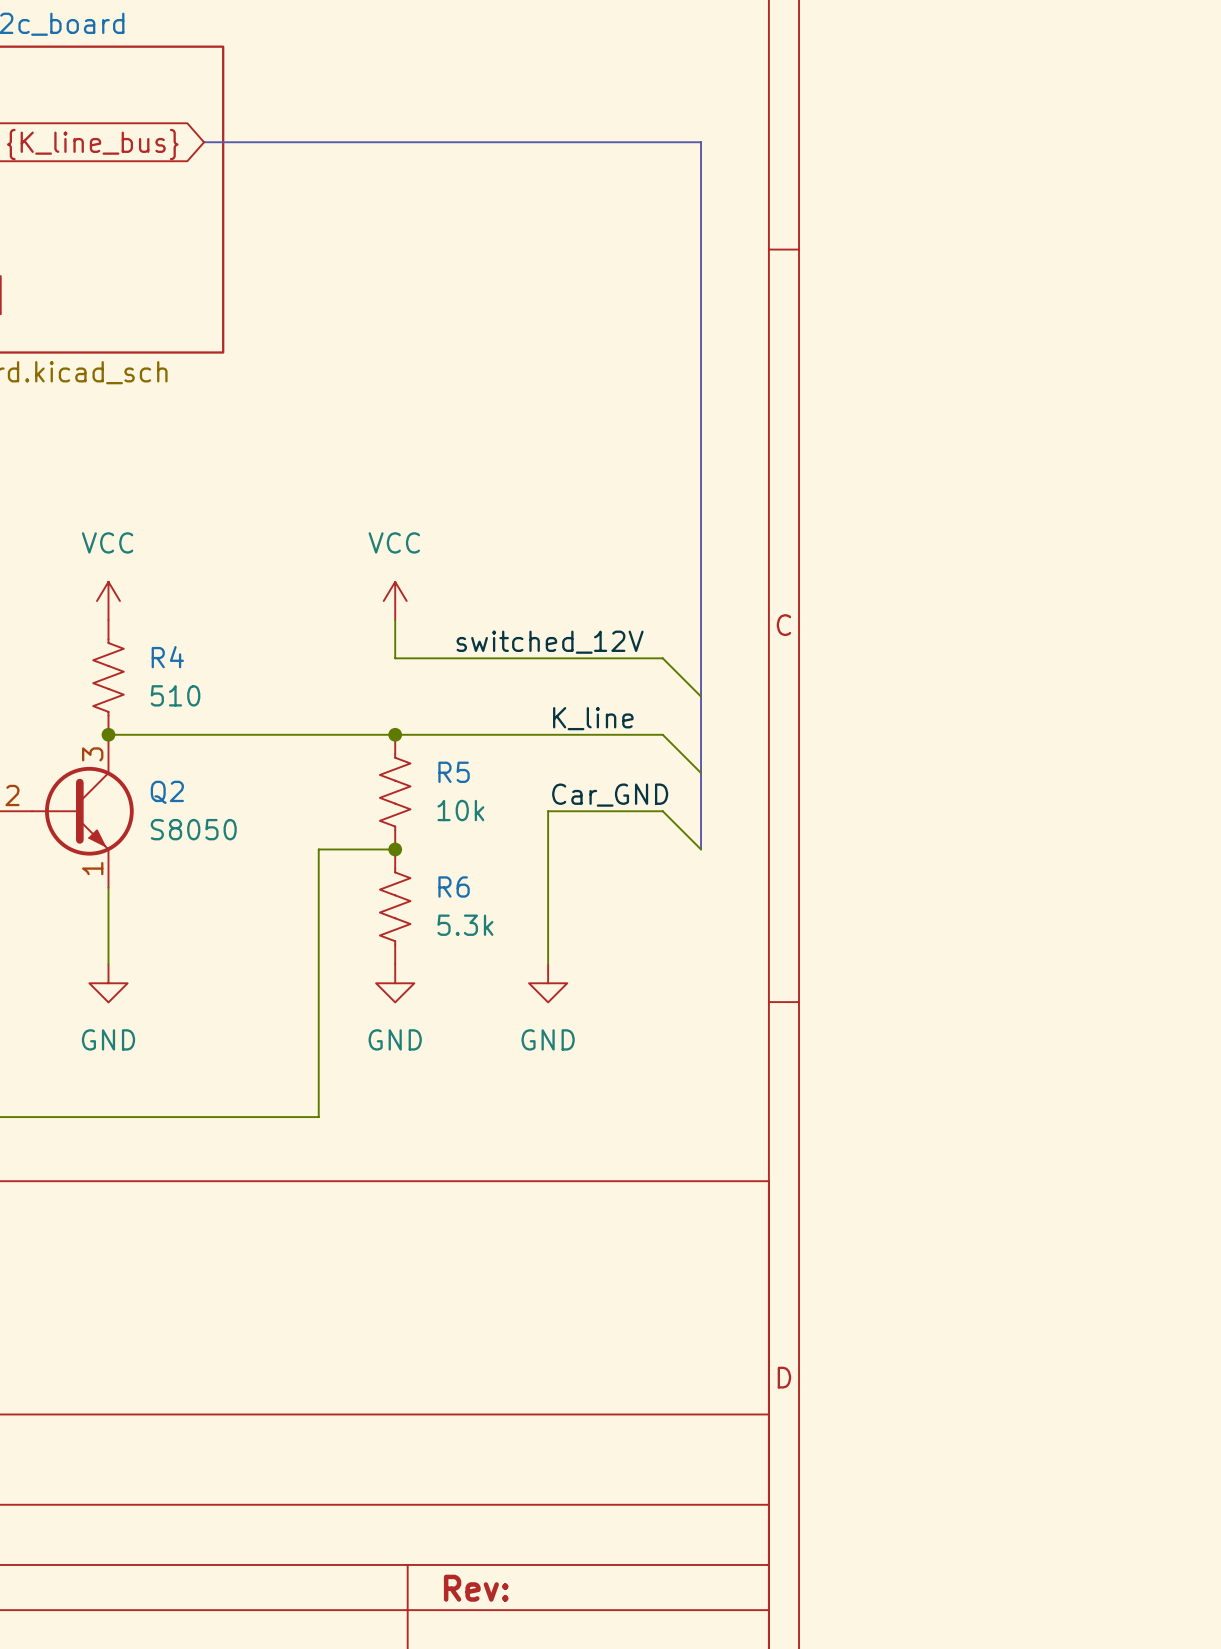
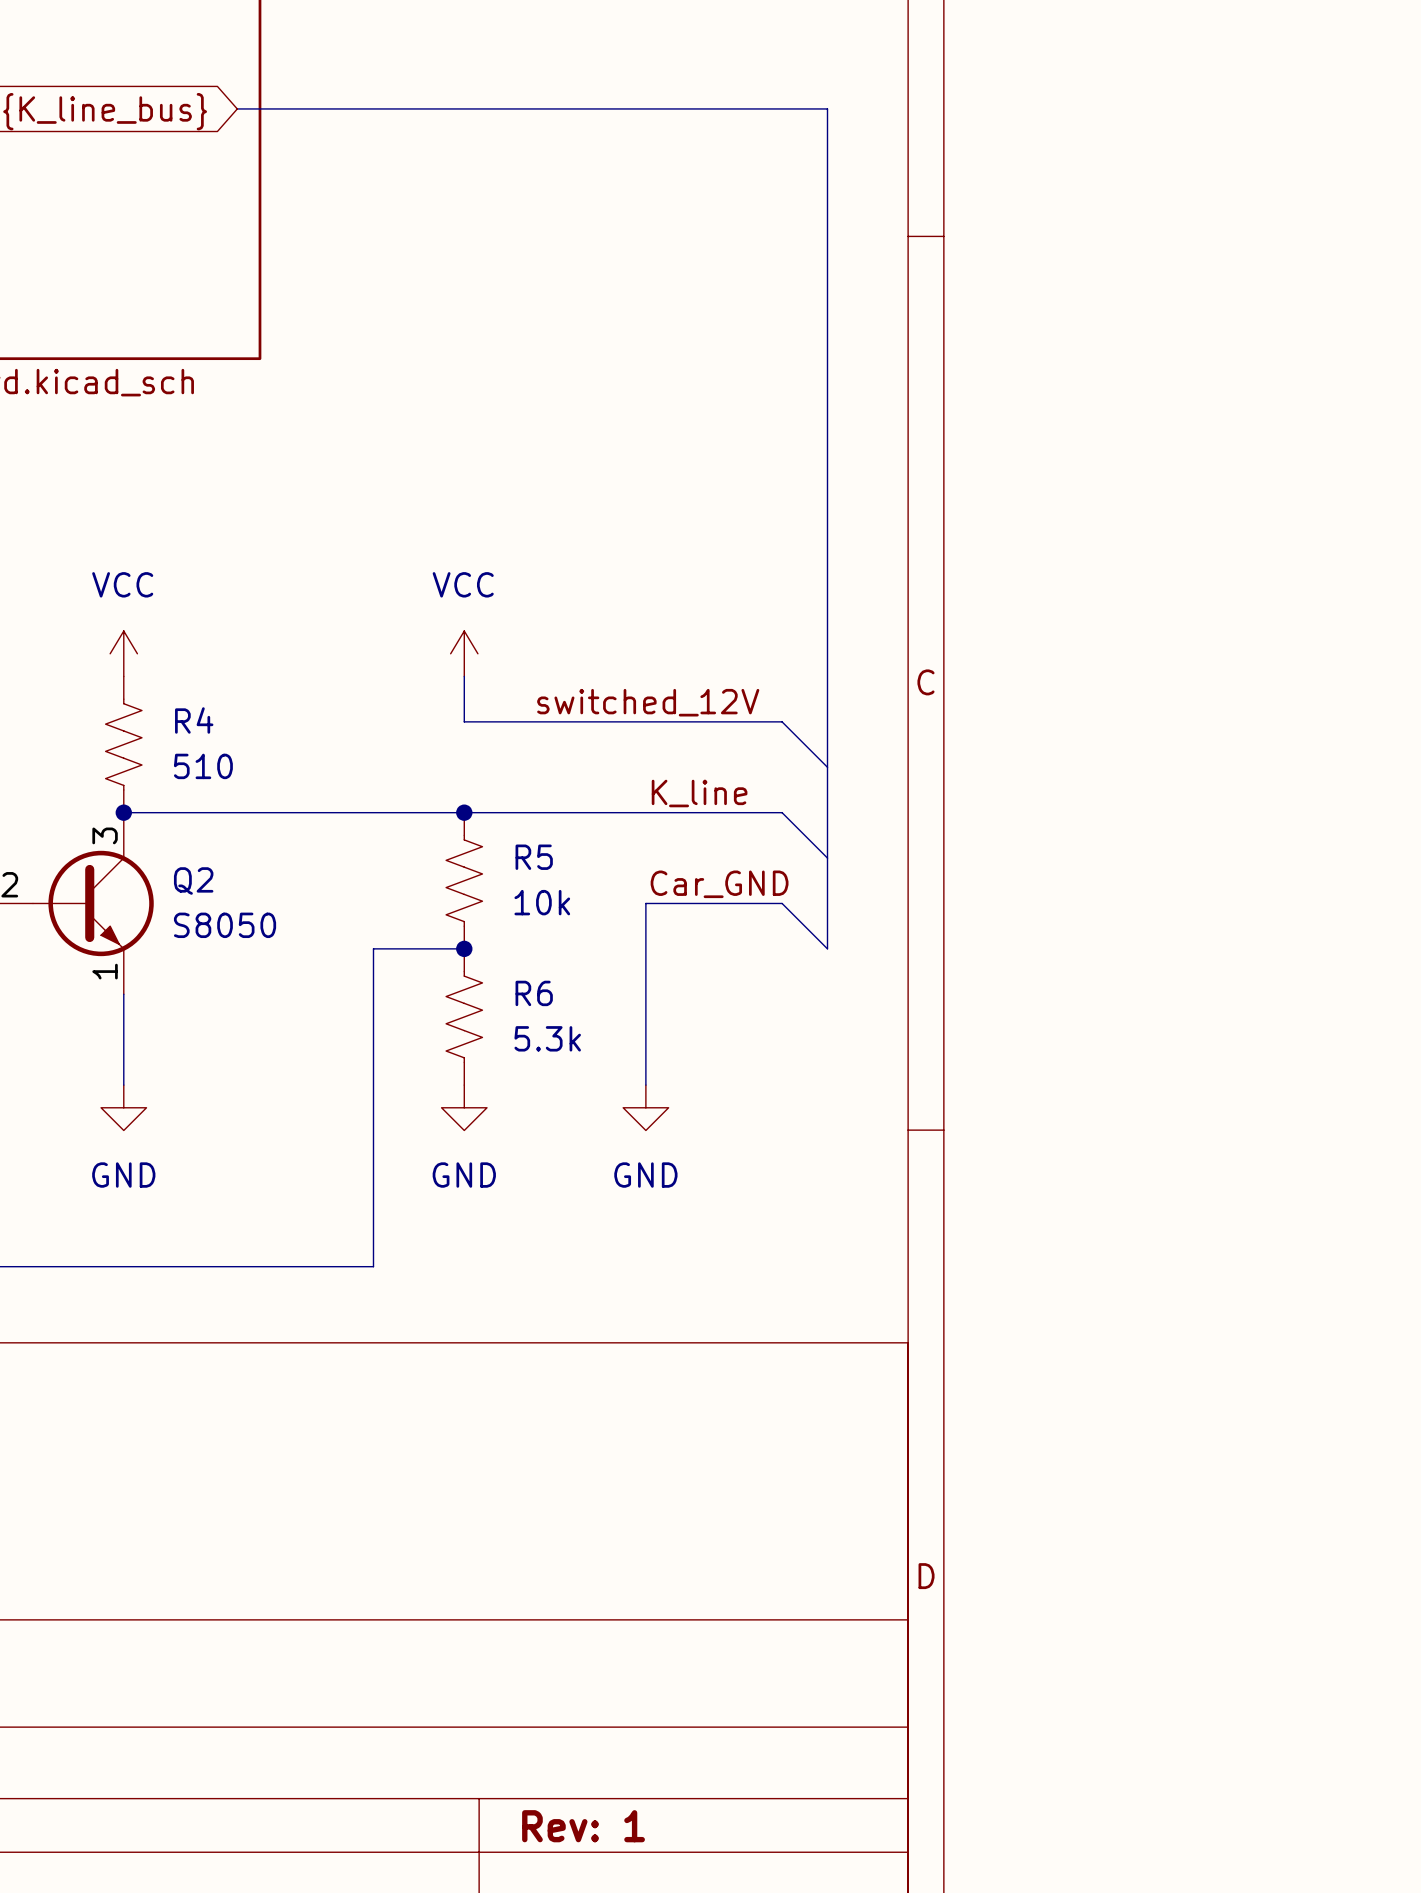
title block: Rev: (476, 1588) -> Rev: 1 (583, 1826)

